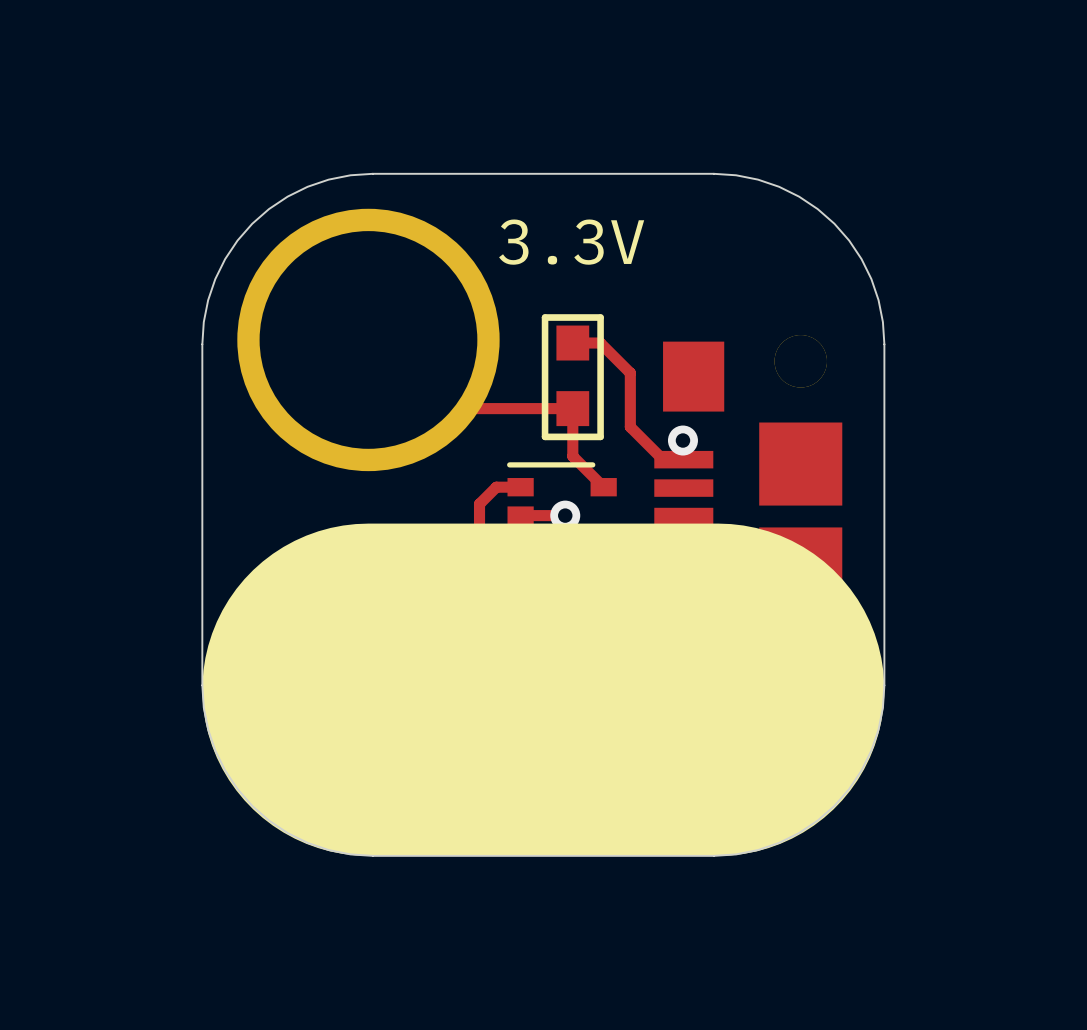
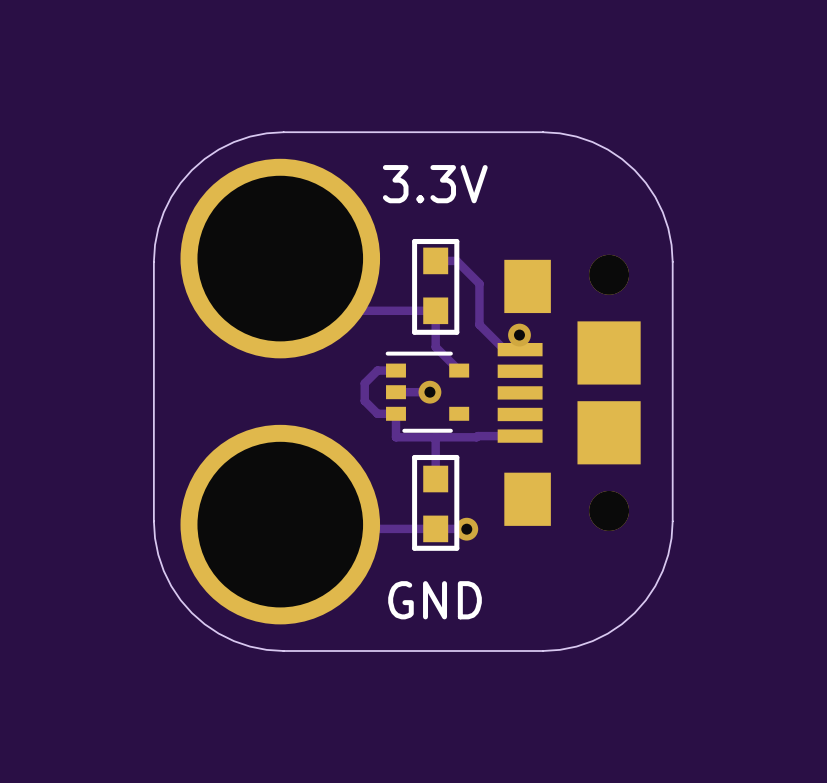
part footprint: [201, 172, 886, 857] -> [153, 131, 674, 652]

